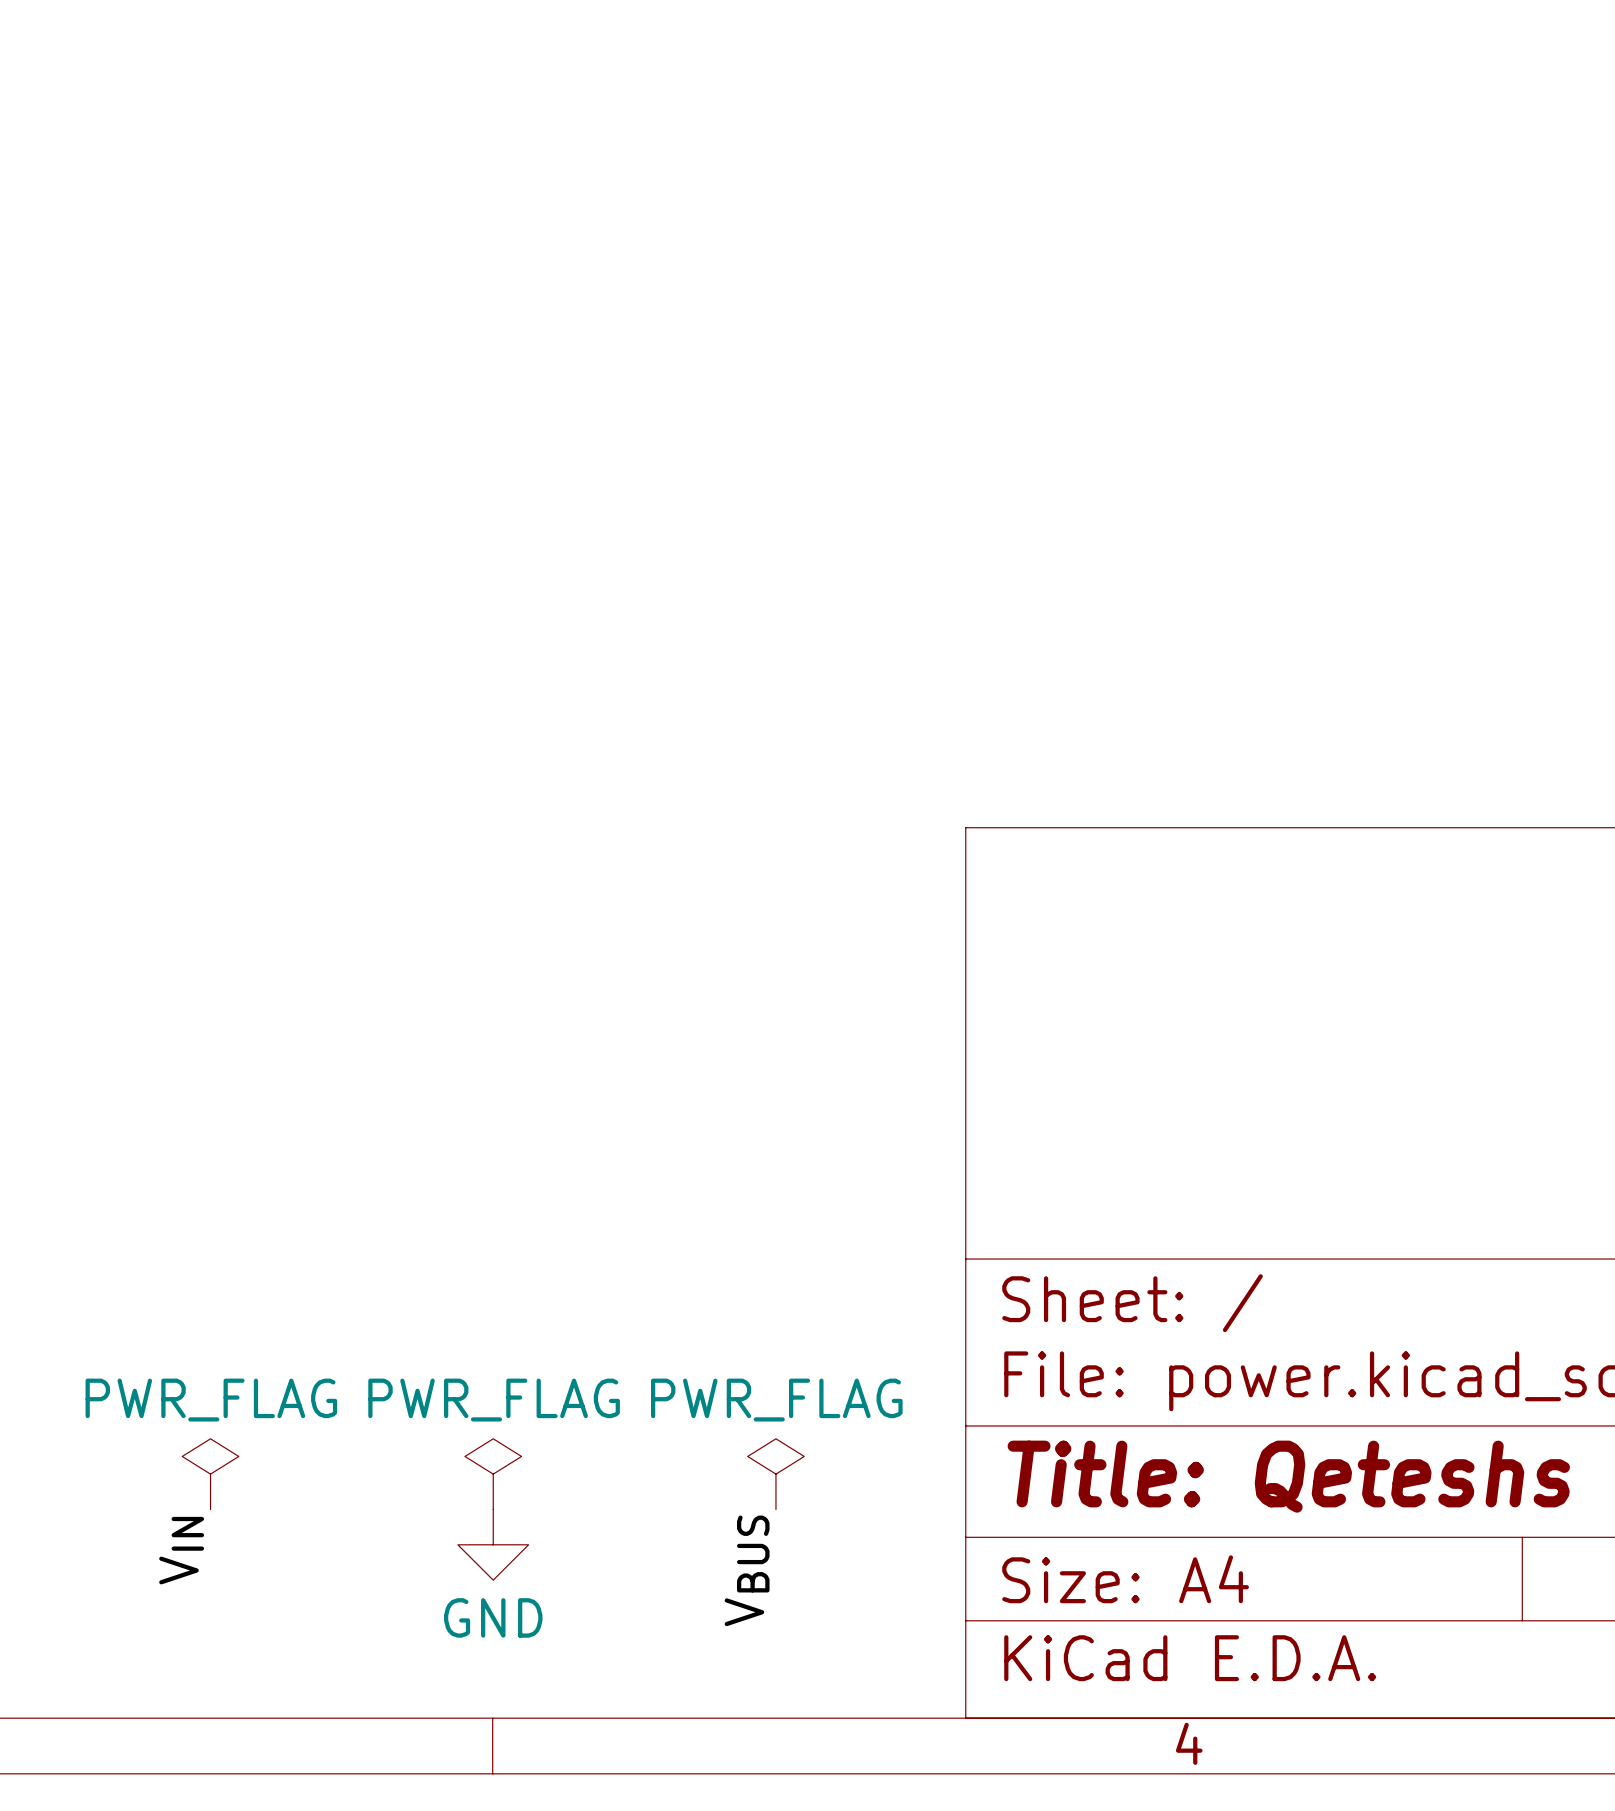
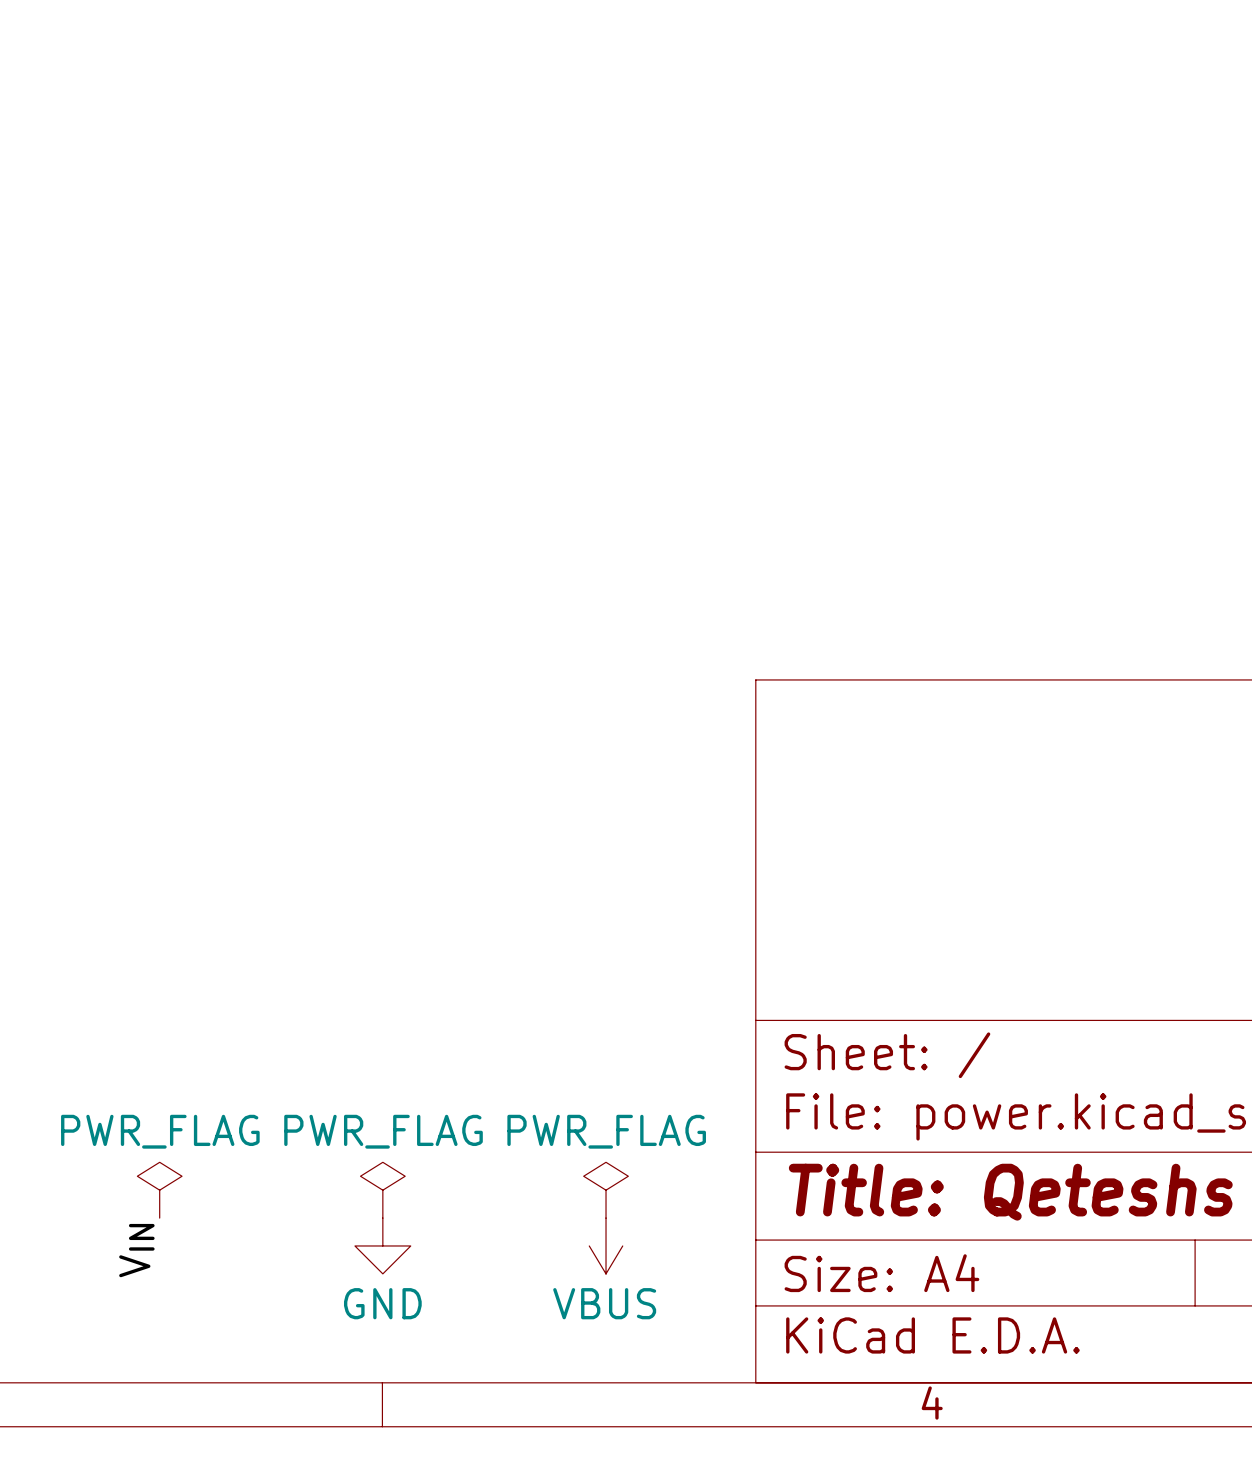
power symbol: none -> VBUS (606, 1245)
label: VBUS (747, 1570) -> none

